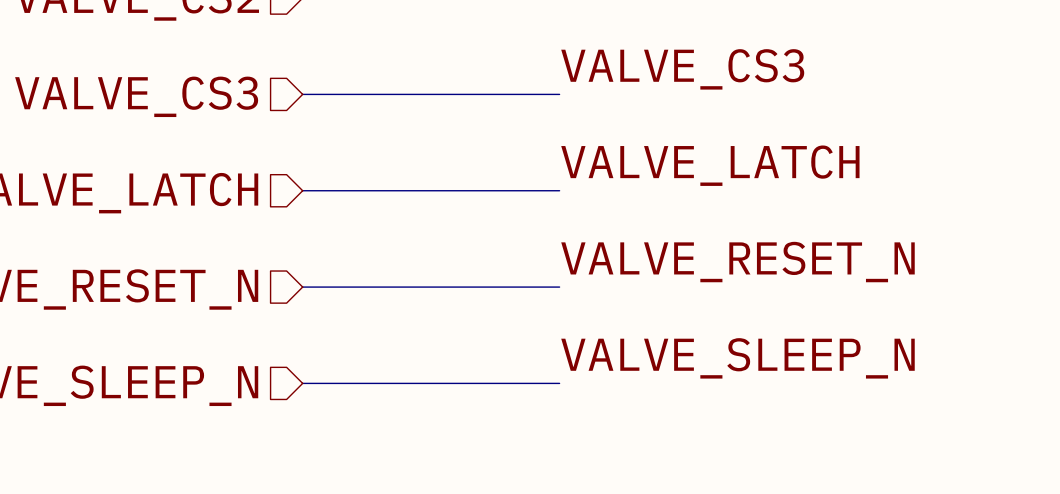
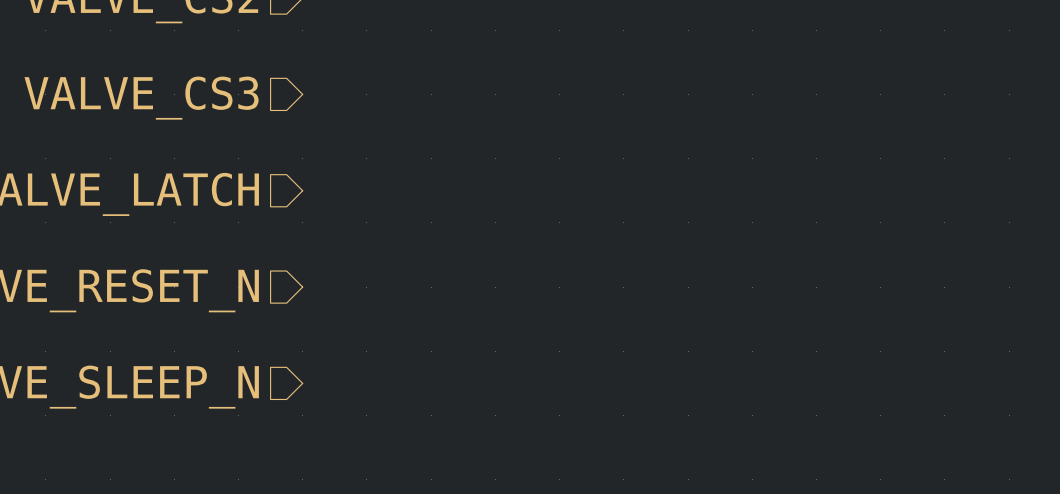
label: VALVE_CS3 (682, 69) -> none
wire: (302, 94) (559, 94) -> none
label: VALVE_LATCH (710, 165) -> none
wire: (302, 190) (559, 190) -> none
label: VALVE_RESET_N (737, 262) -> none
wire: (302, 287) (559, 287) -> none
label: VALVE_SLEEP_N (737, 358) -> none
wire: (302, 383) (559, 383) -> none

